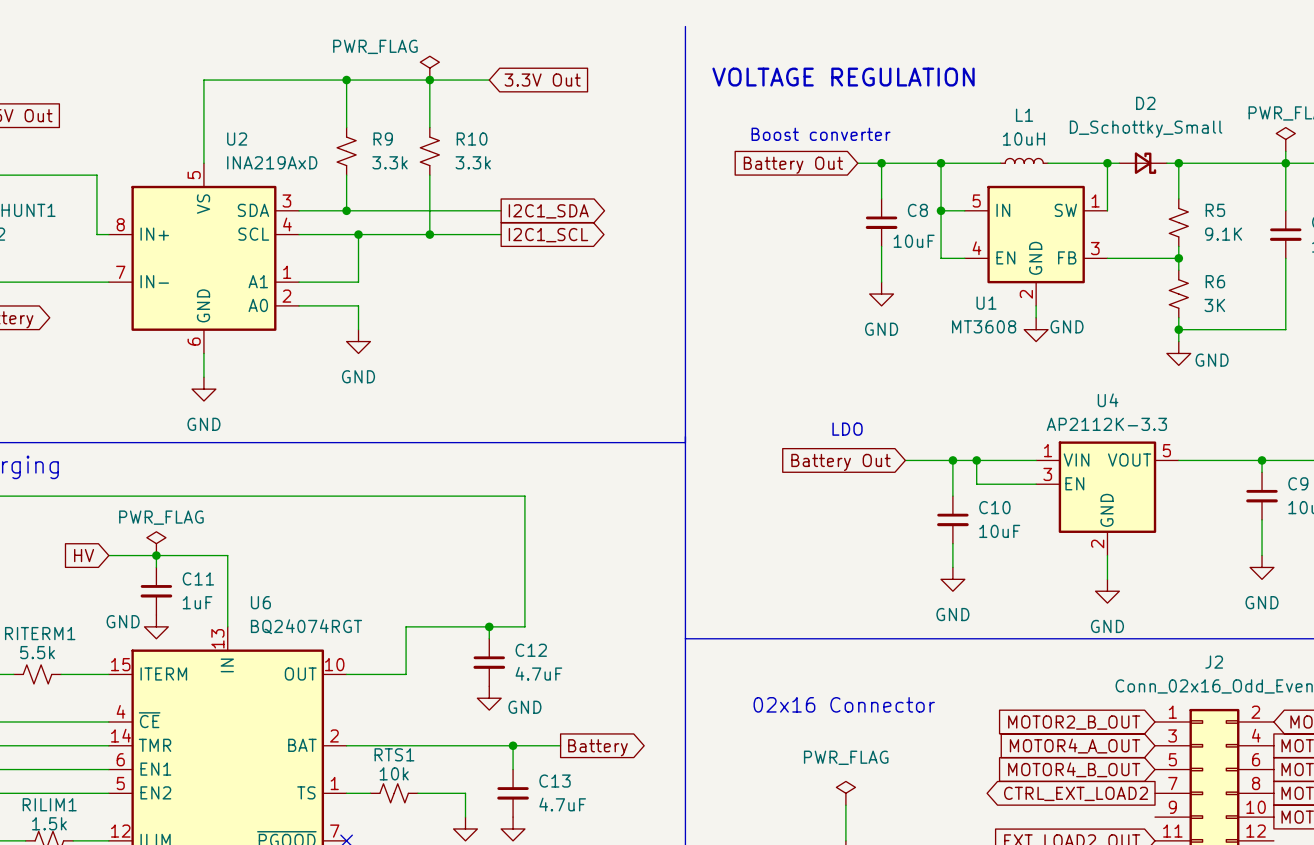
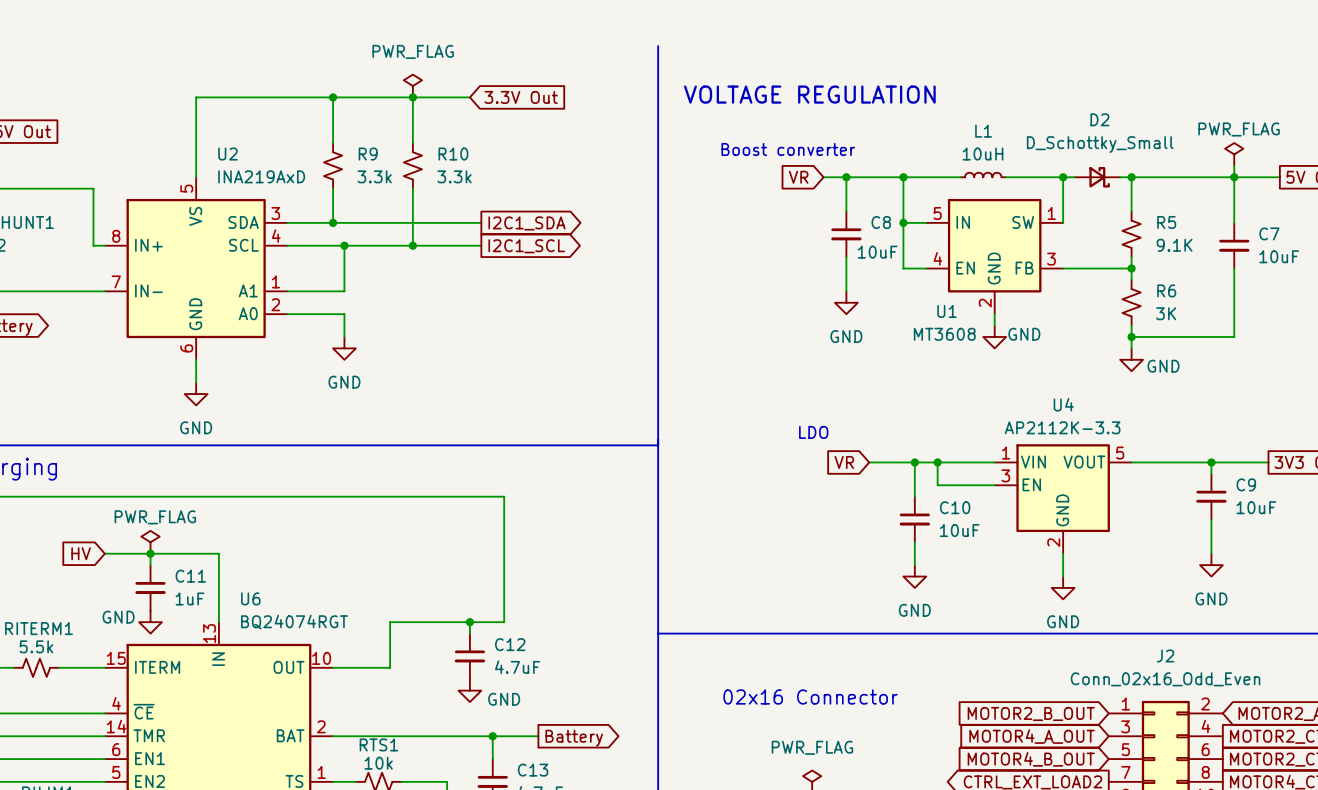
power symbol text position: PWR_FLAG (375, 46) -> PWR_FLAG (413, 51)
global label: Battery Out (793, 165) -> VR (798, 177)
global label: Battery Out (840, 462) -> VR (844, 462)

